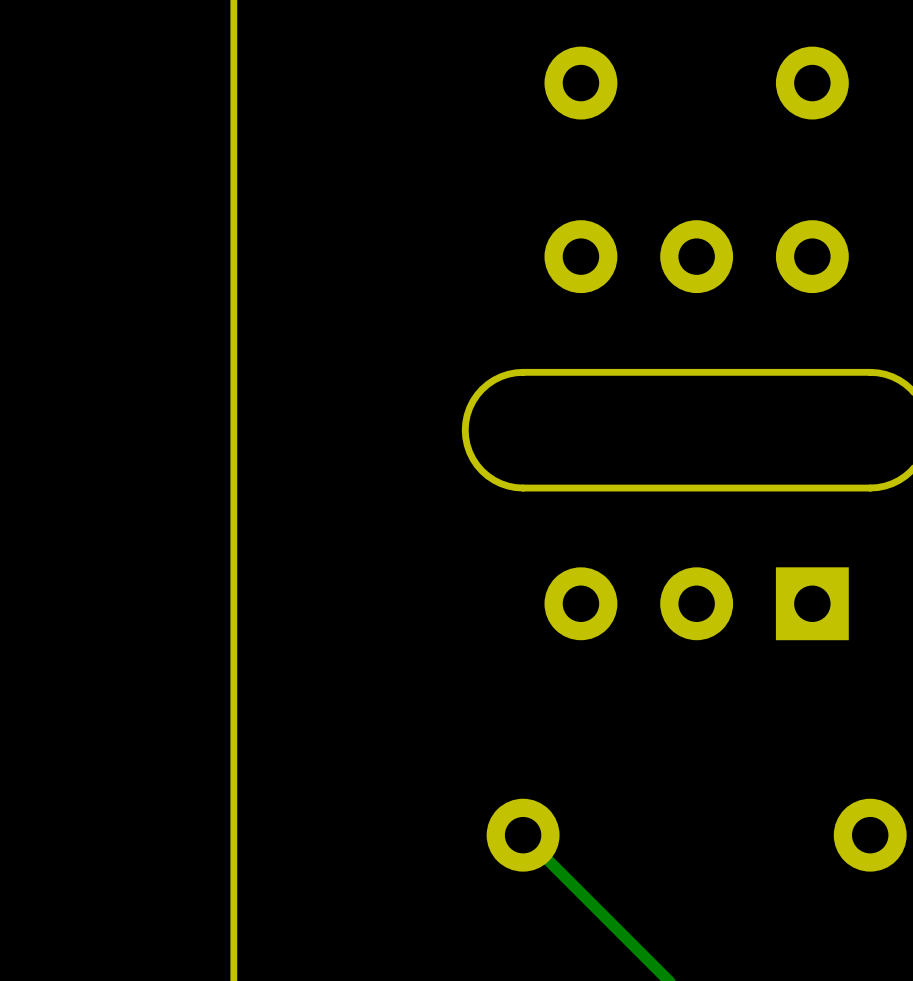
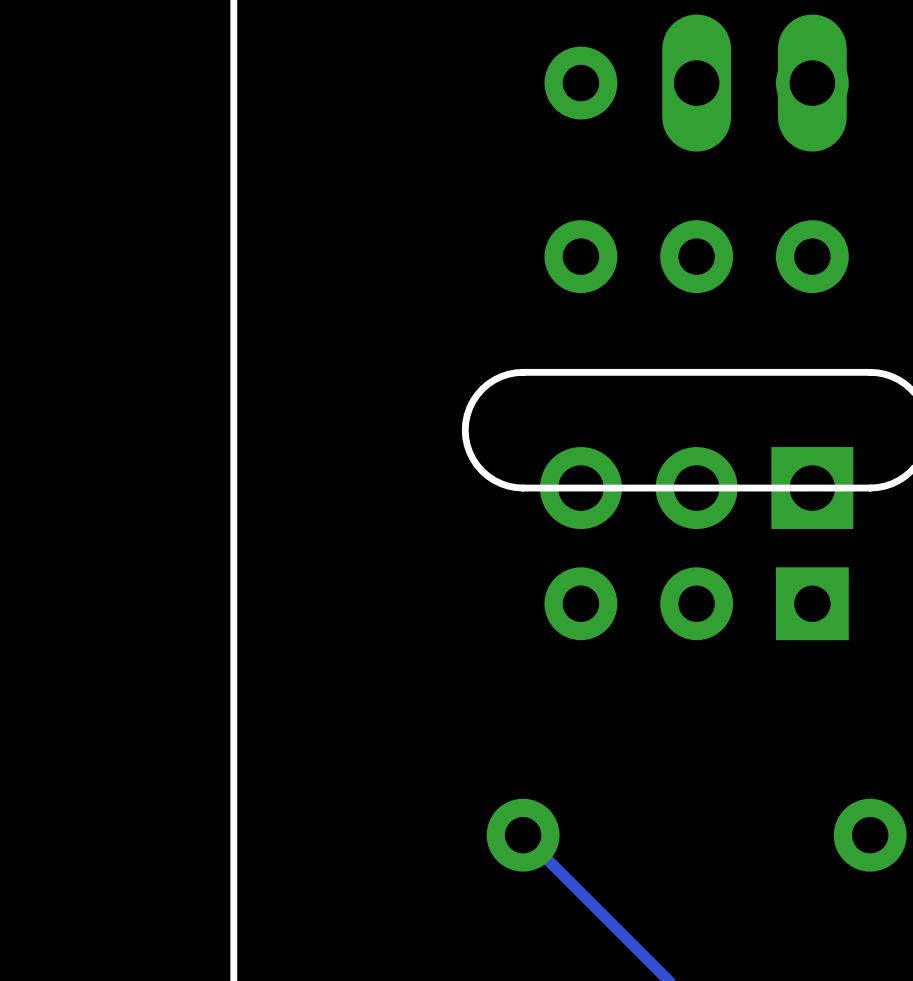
part: none -> (754, 83)
part: none -> (696, 488)

